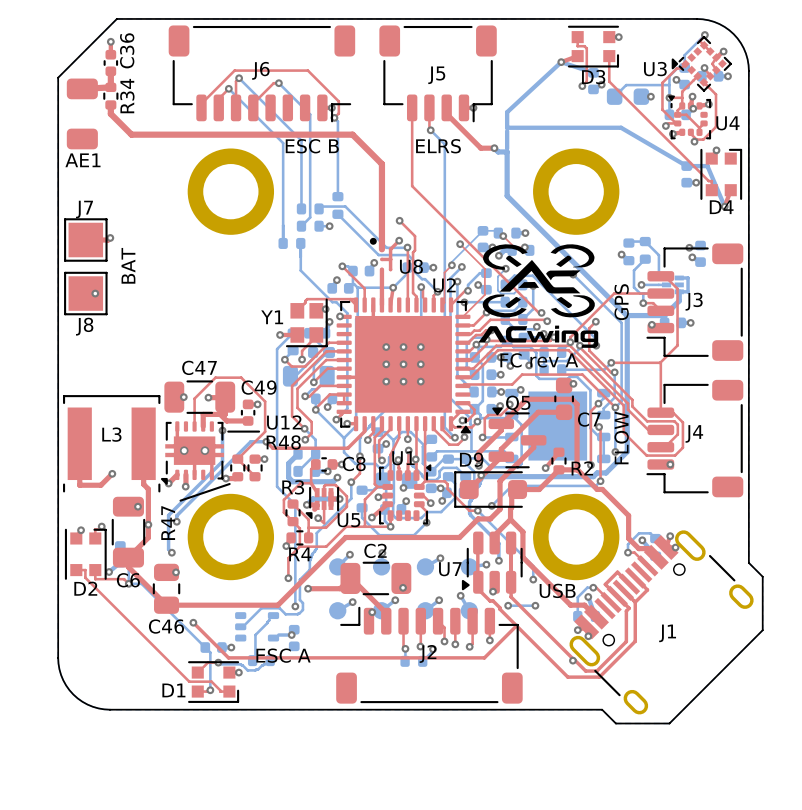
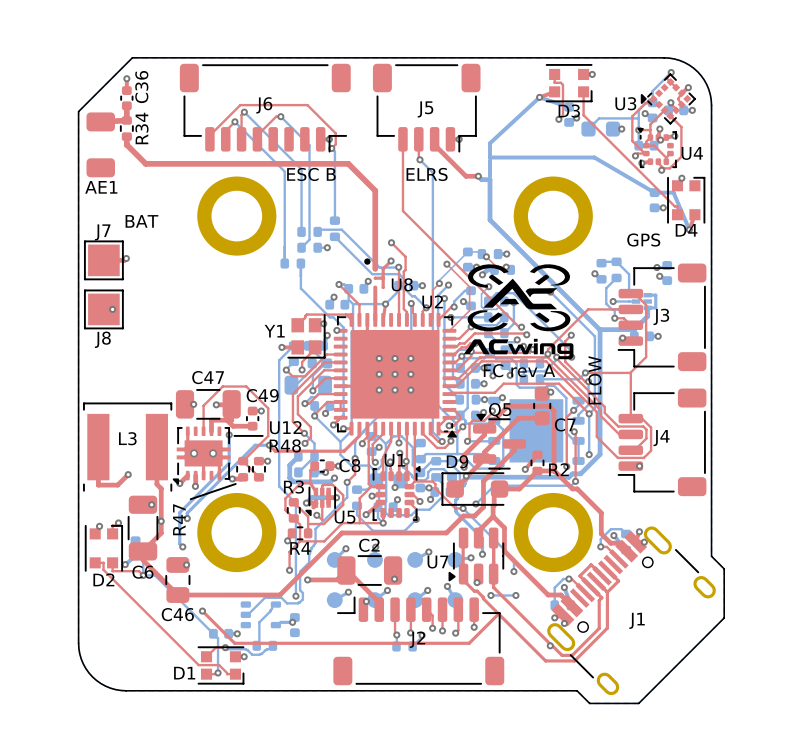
text rotation: 0° (128, 265) -> 90° clockwise (141, 221)
text position: BAT (128, 265) -> BAT (141, 221)
text rotation: 0° (621, 302) -> 90° clockwise (643, 240)
text position: GPS (621, 302) -> GPS (643, 240)
text position: FLOW (621, 437) -> FLOW (594, 380)
text: USB (557, 590) -> none
text: ESC A (283, 655) -> none

